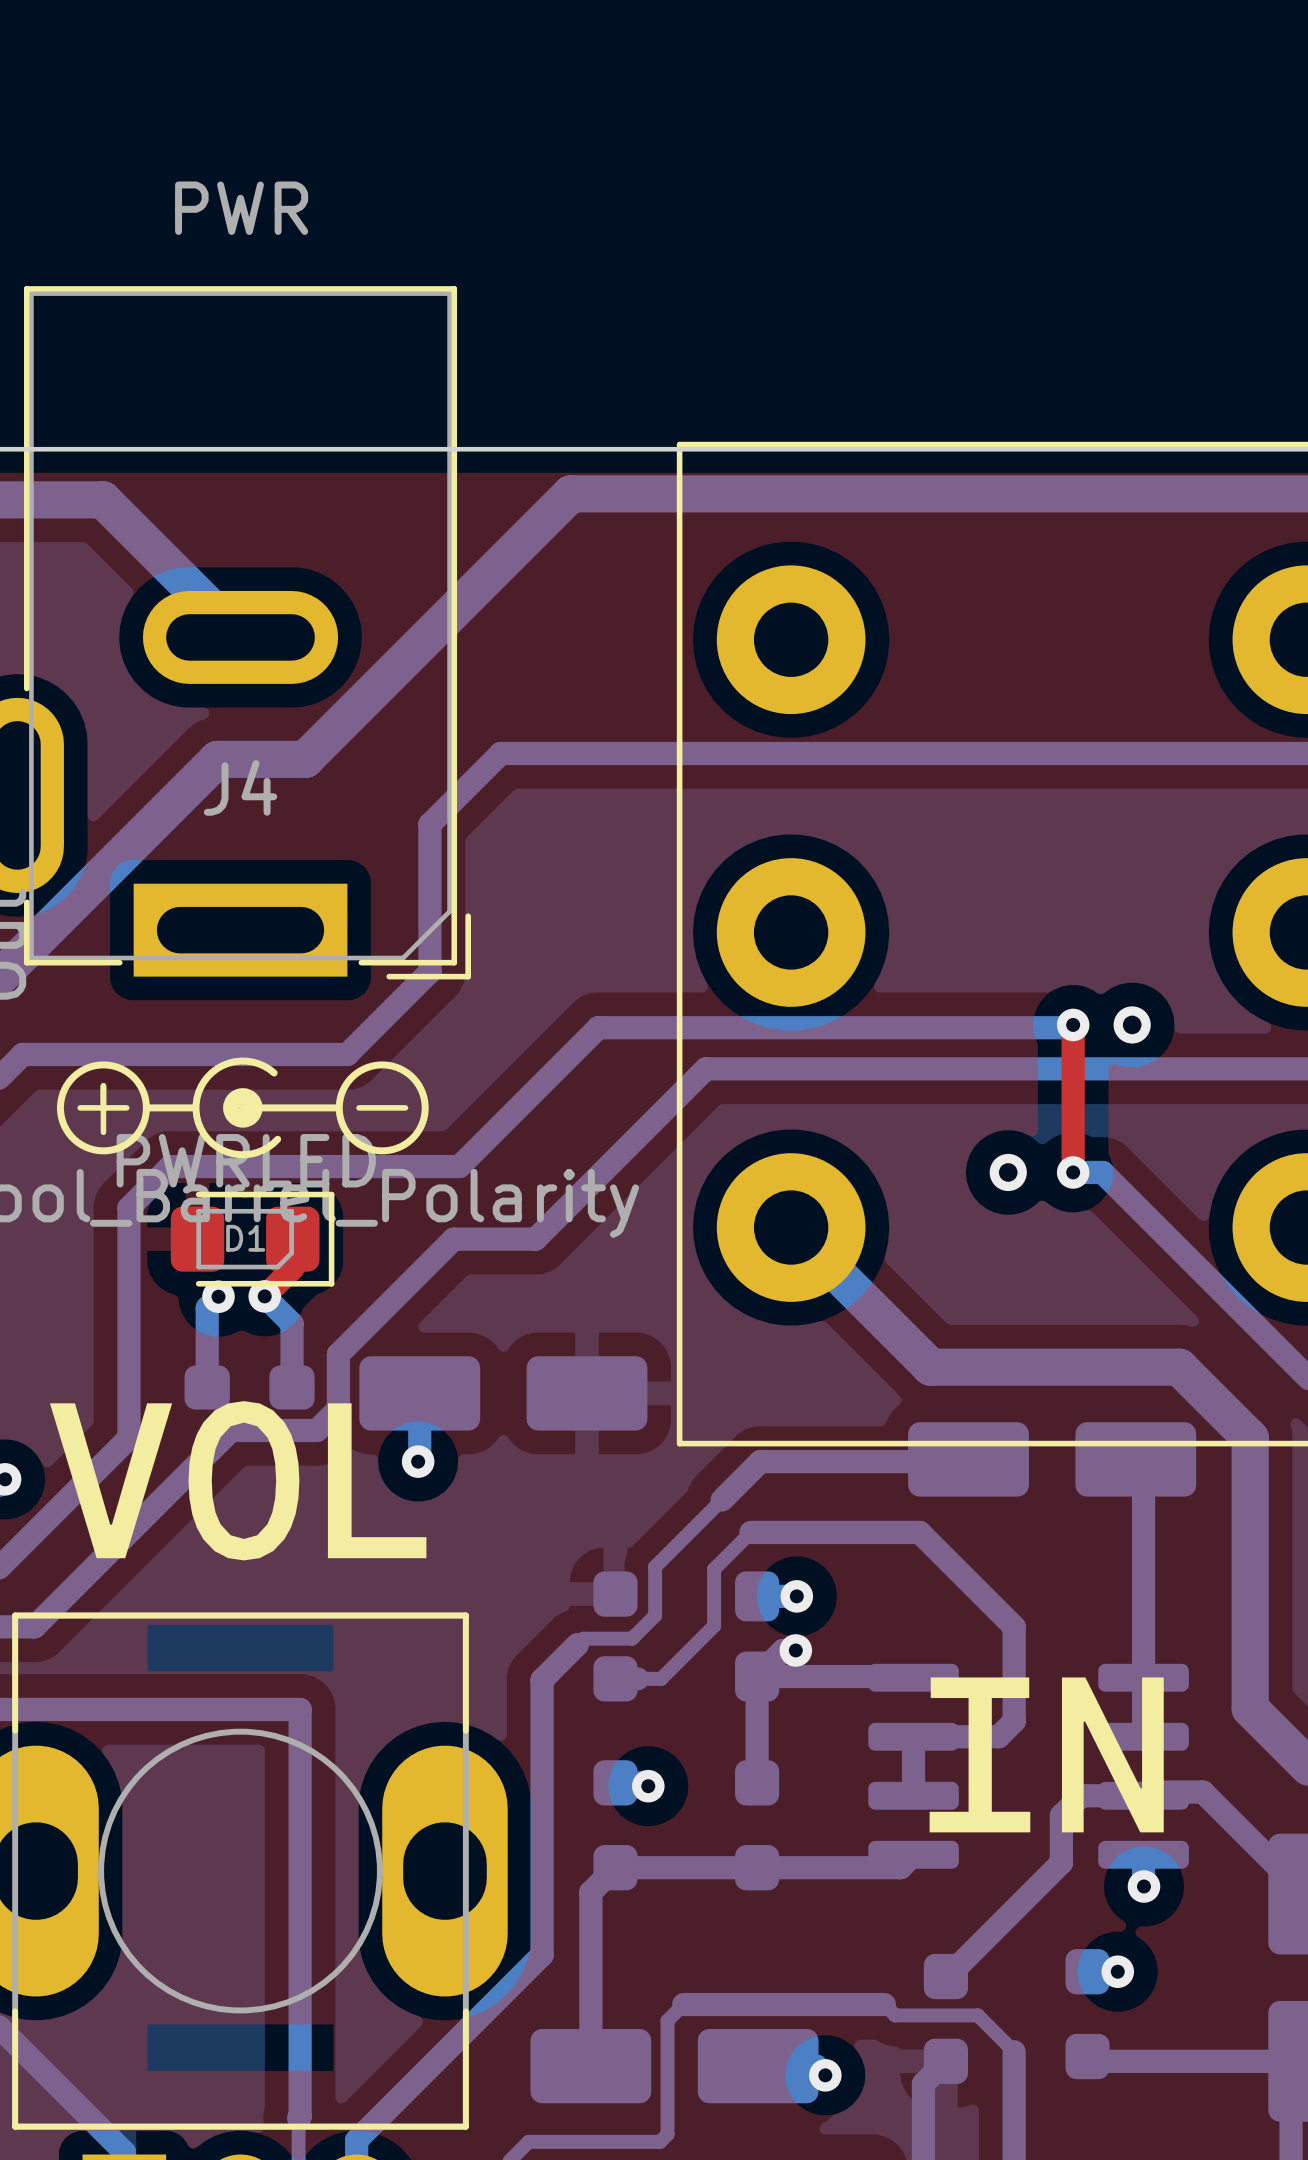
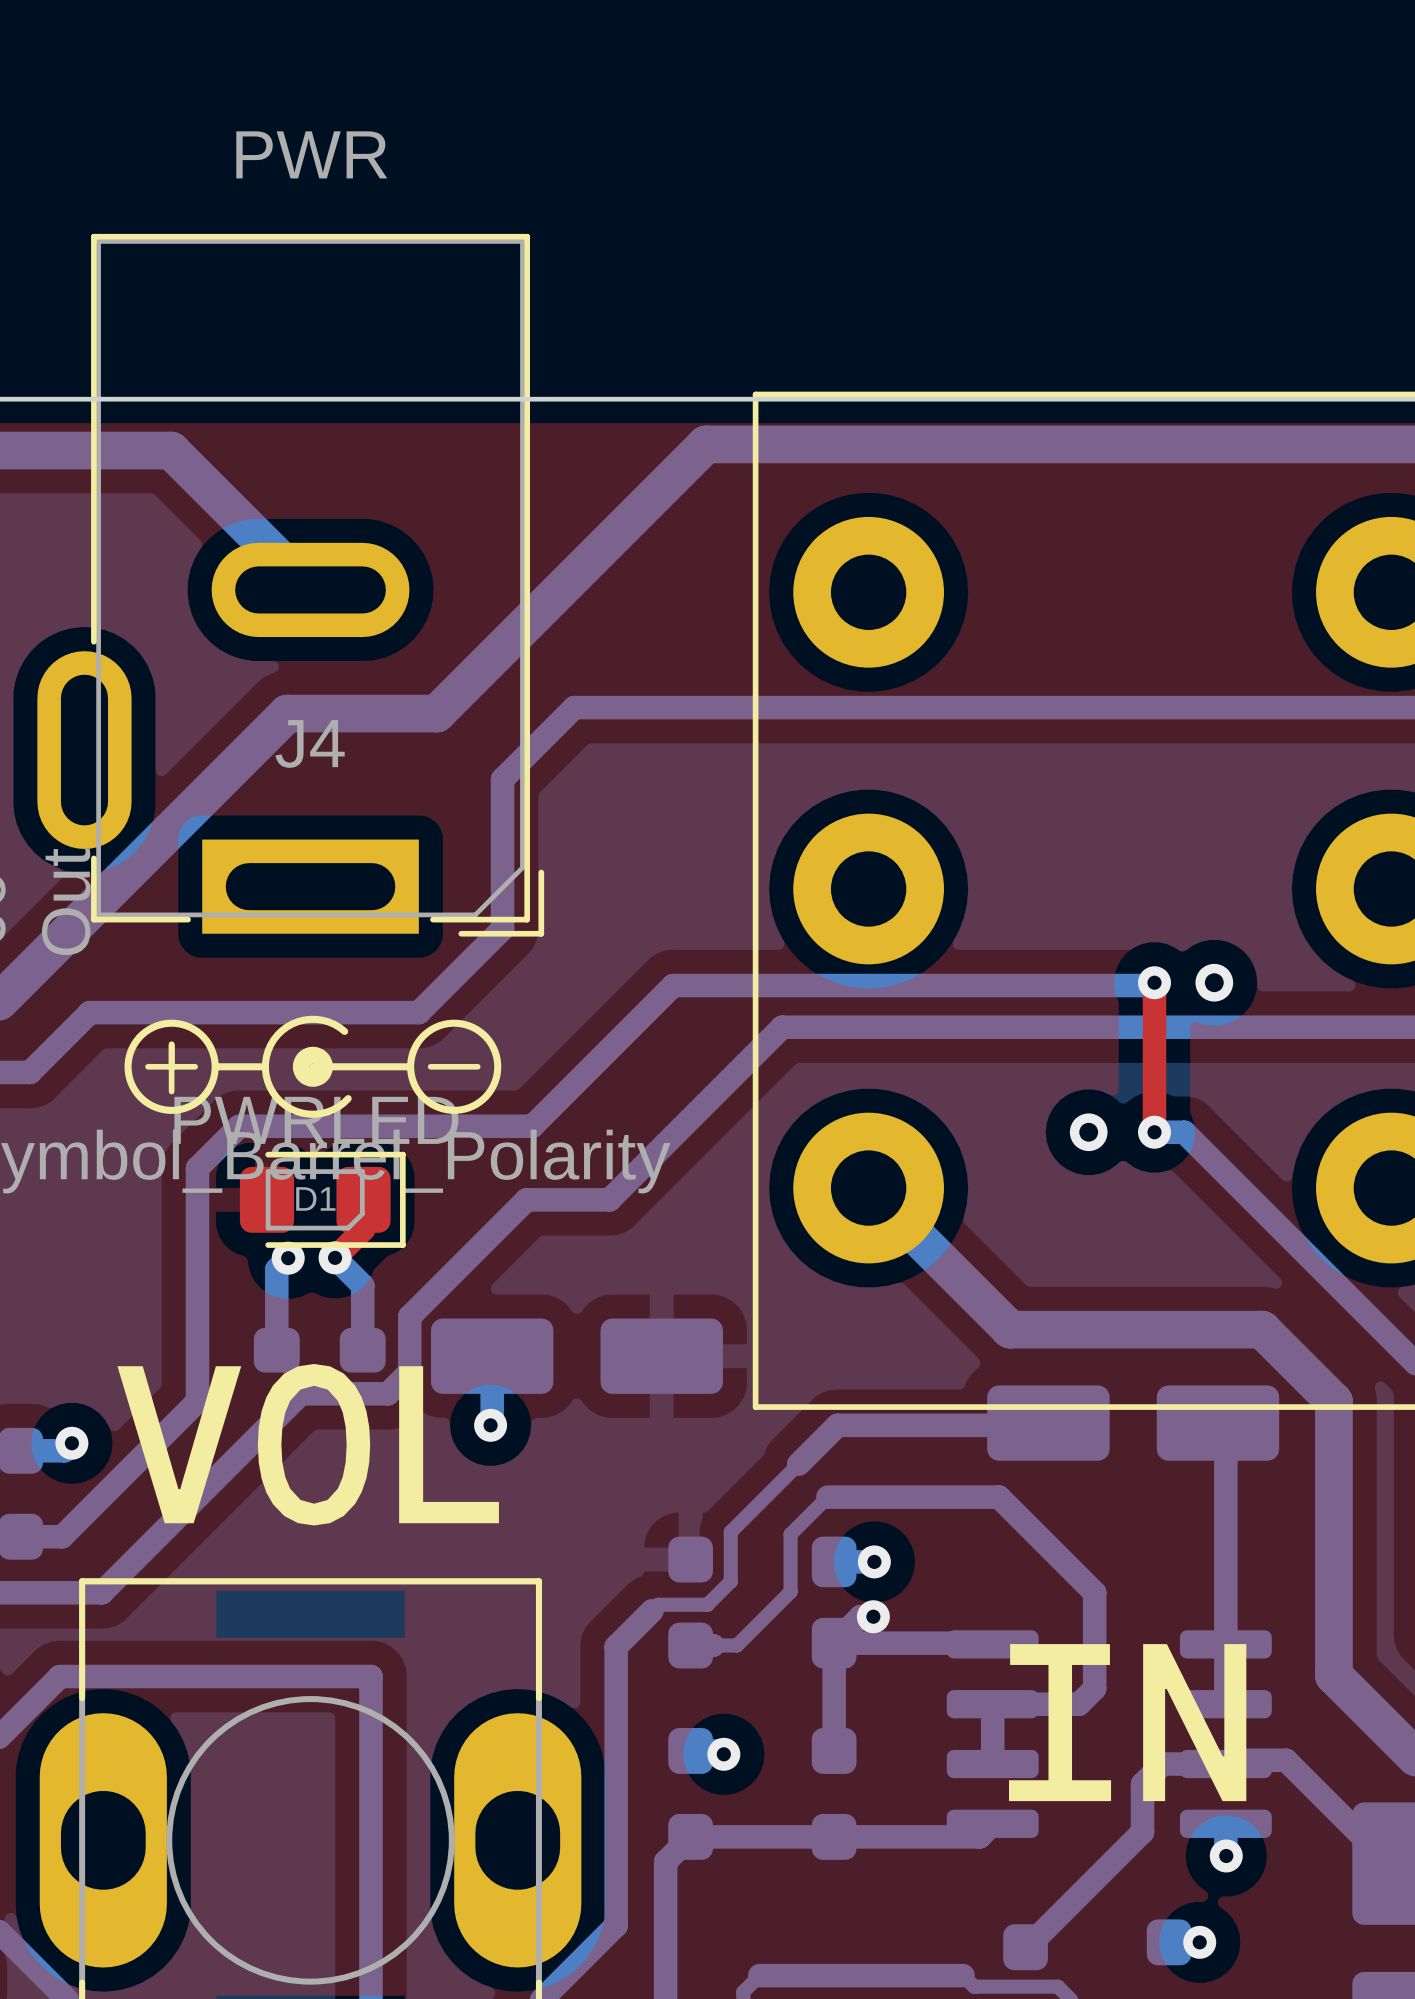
bottom track: (630, 493) (570, 493) (305, 759) -> (705, 444) (436, 713) (376, 713)

